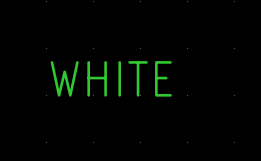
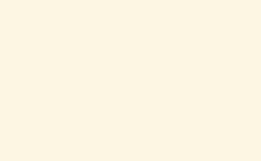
text: WHITE (111, 78) -> none

